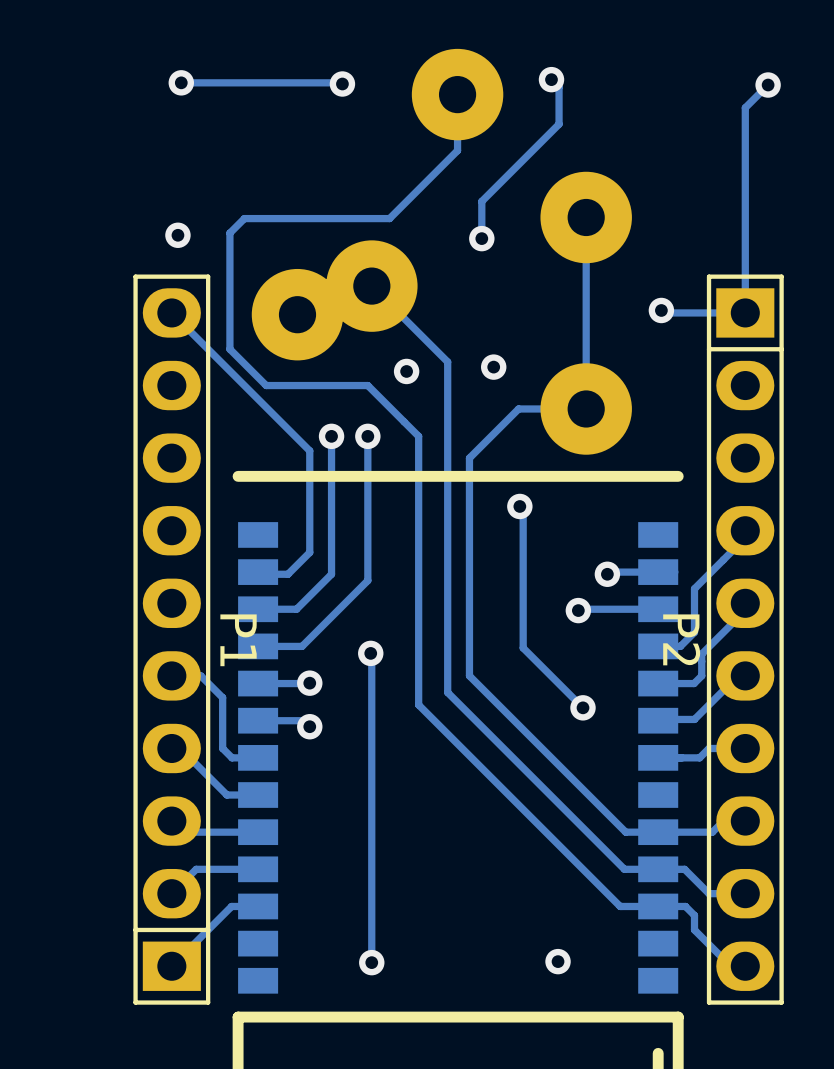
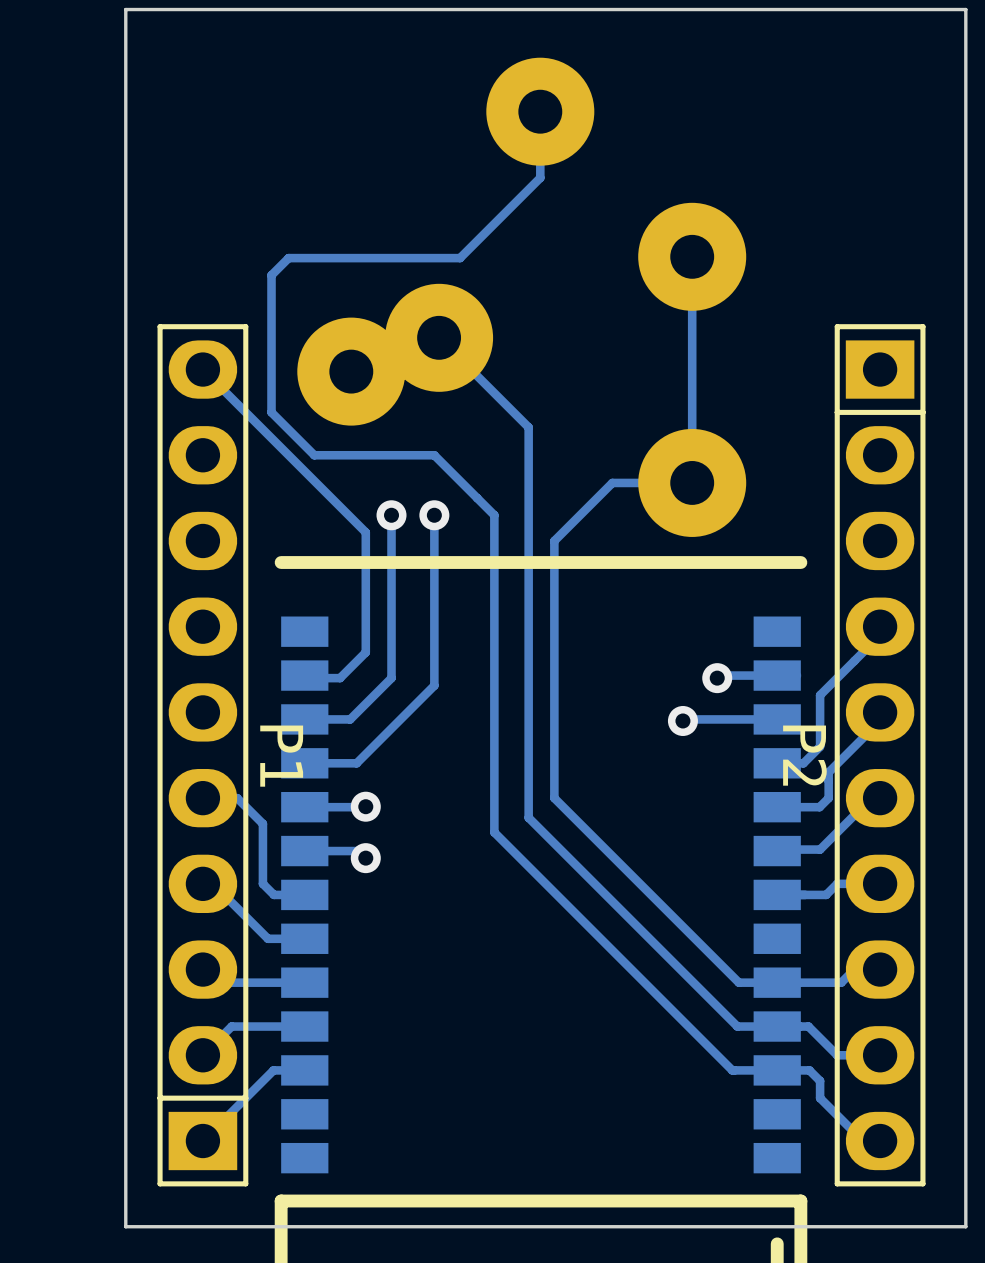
board edge: none -> (965, 9) (965, 1226) (125, 1226) (125, 9) (965, 9)
track: (551, 79) (559, 87) (559, 124) (481, 201) (481, 238) -> none
via: (551, 79) -> none
track: (181, 82) (342, 84) -> none
via: (181, 82) -> none
via: (342, 84) -> none
track: (768, 85) (745, 107) (745, 312) (663, 312) (661, 310) -> none
via: (768, 85) -> none
via: (177, 235) -> none
via: (481, 238) -> none
via: (661, 310) -> none
via: (493, 367) -> none
via: (406, 371) -> none
track: (519, 506) (523, 509) (523, 648) (583, 707) -> none
via: (519, 506) -> none
track: (370, 653) (371, 962) -> none
via: (370, 653) -> none
via: (583, 707) -> none
via: (558, 961) -> none
via: (371, 962) -> none

